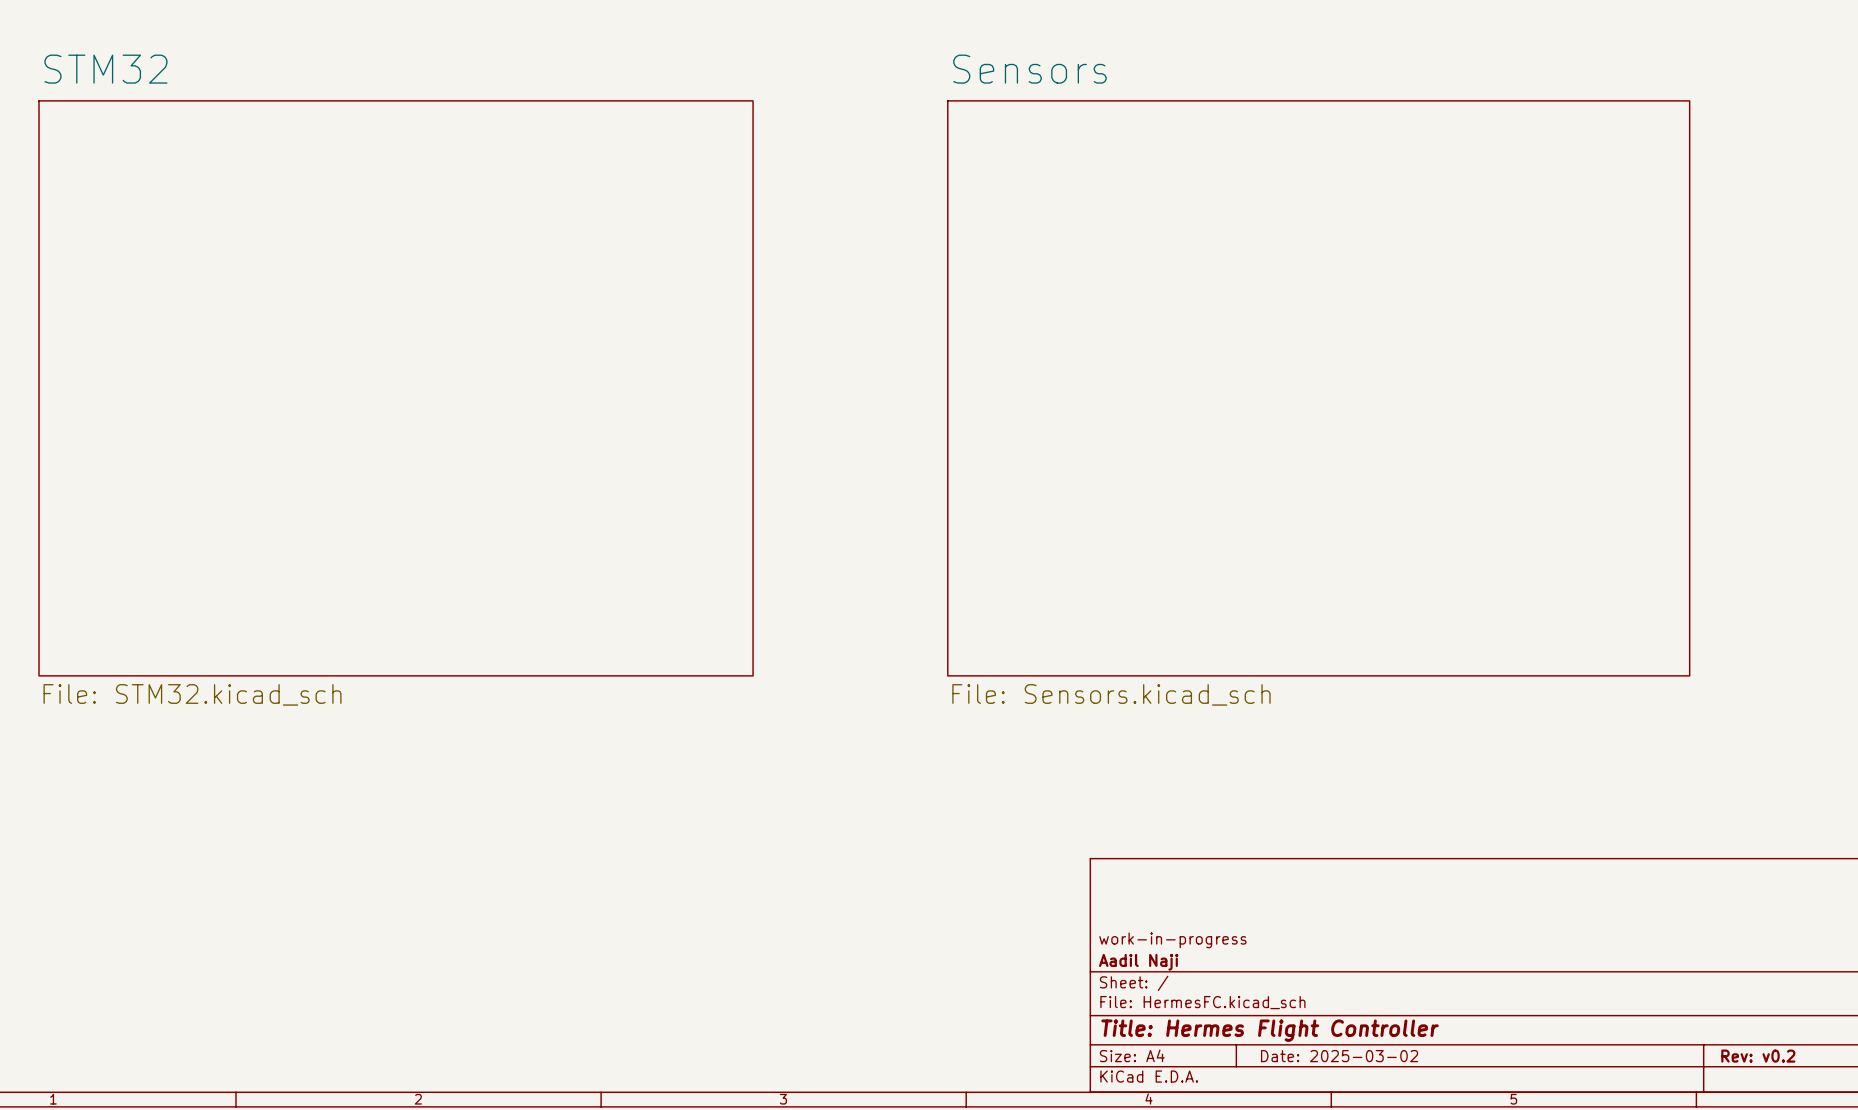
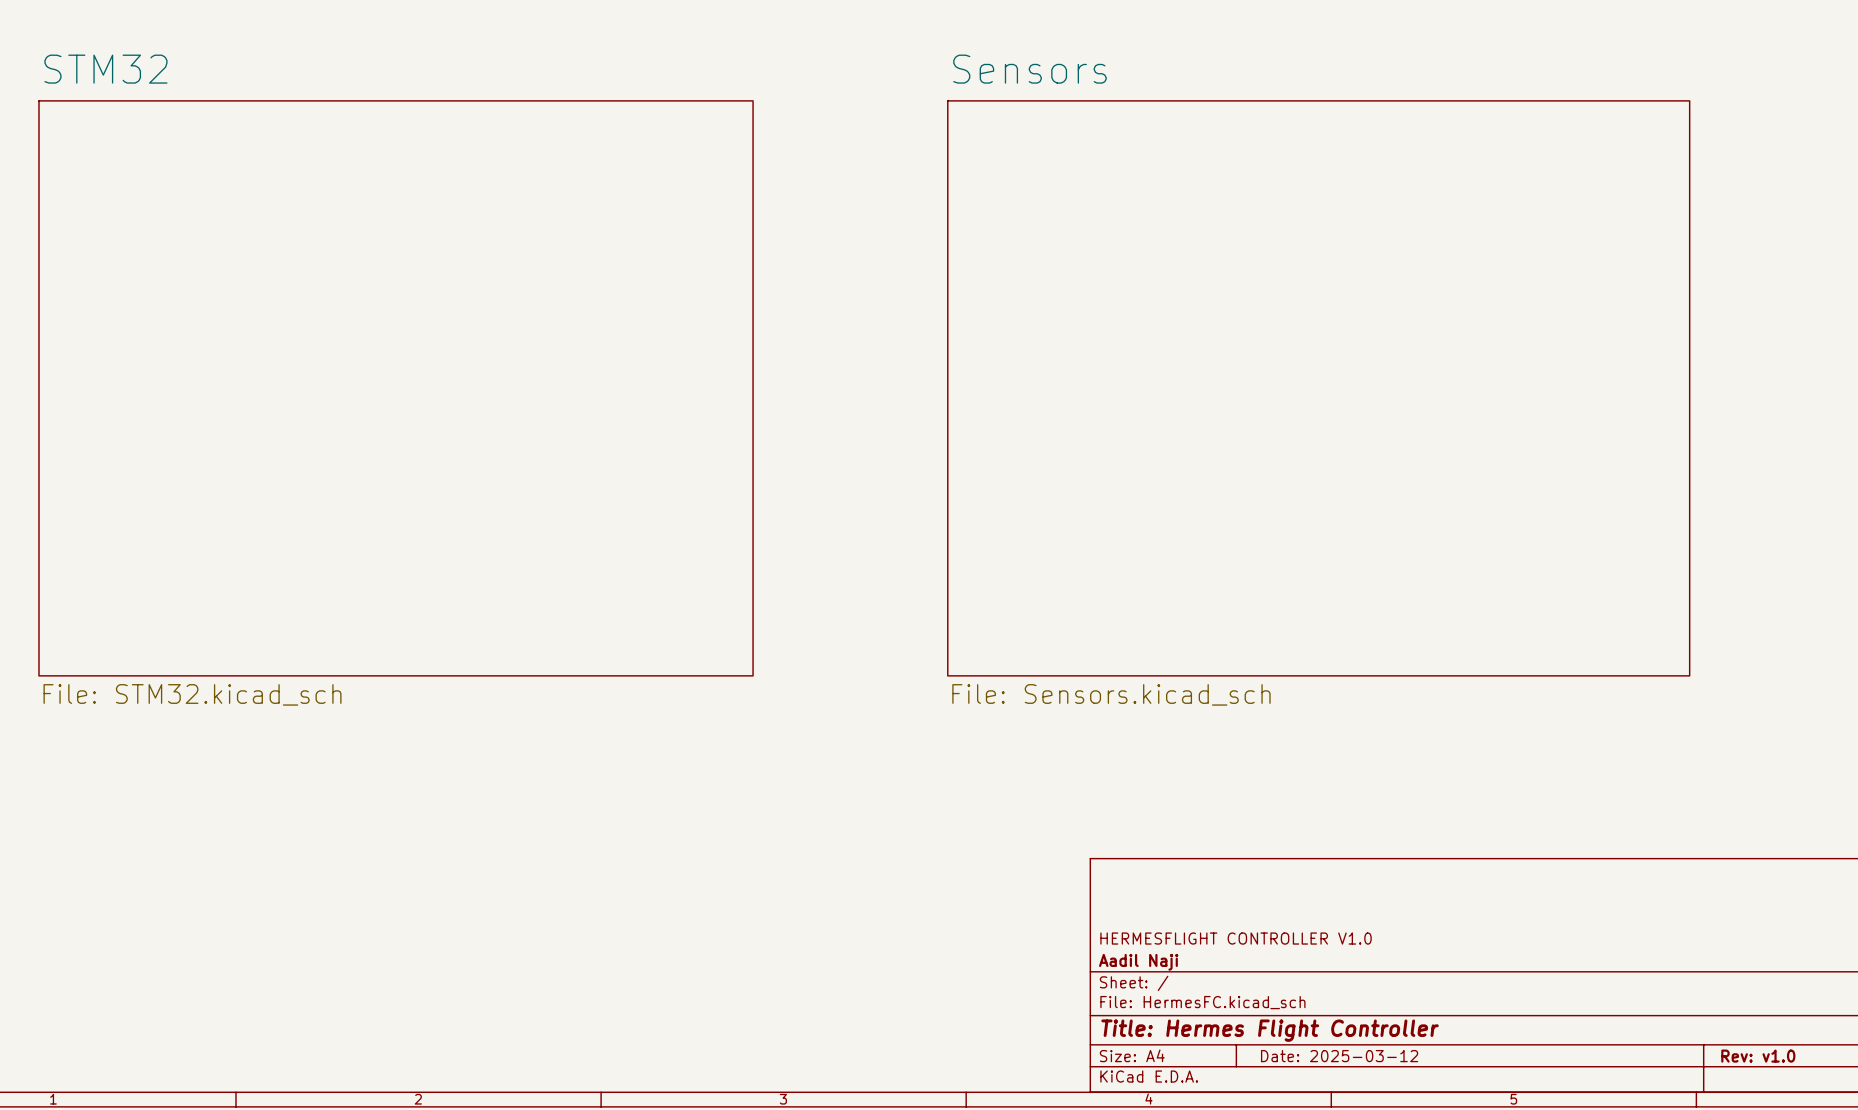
title block: work-in-progress (1172, 940) -> HERMESFLIGHT CONTROLLER V1.0 (1236, 938)
title block: Date: 2025-03-02 (1339, 1056) -> Date: 2025-03-12 (1339, 1056)
title block: Rev: v0.2 (1758, 1056) -> Rev: v1.0 (1758, 1056)

